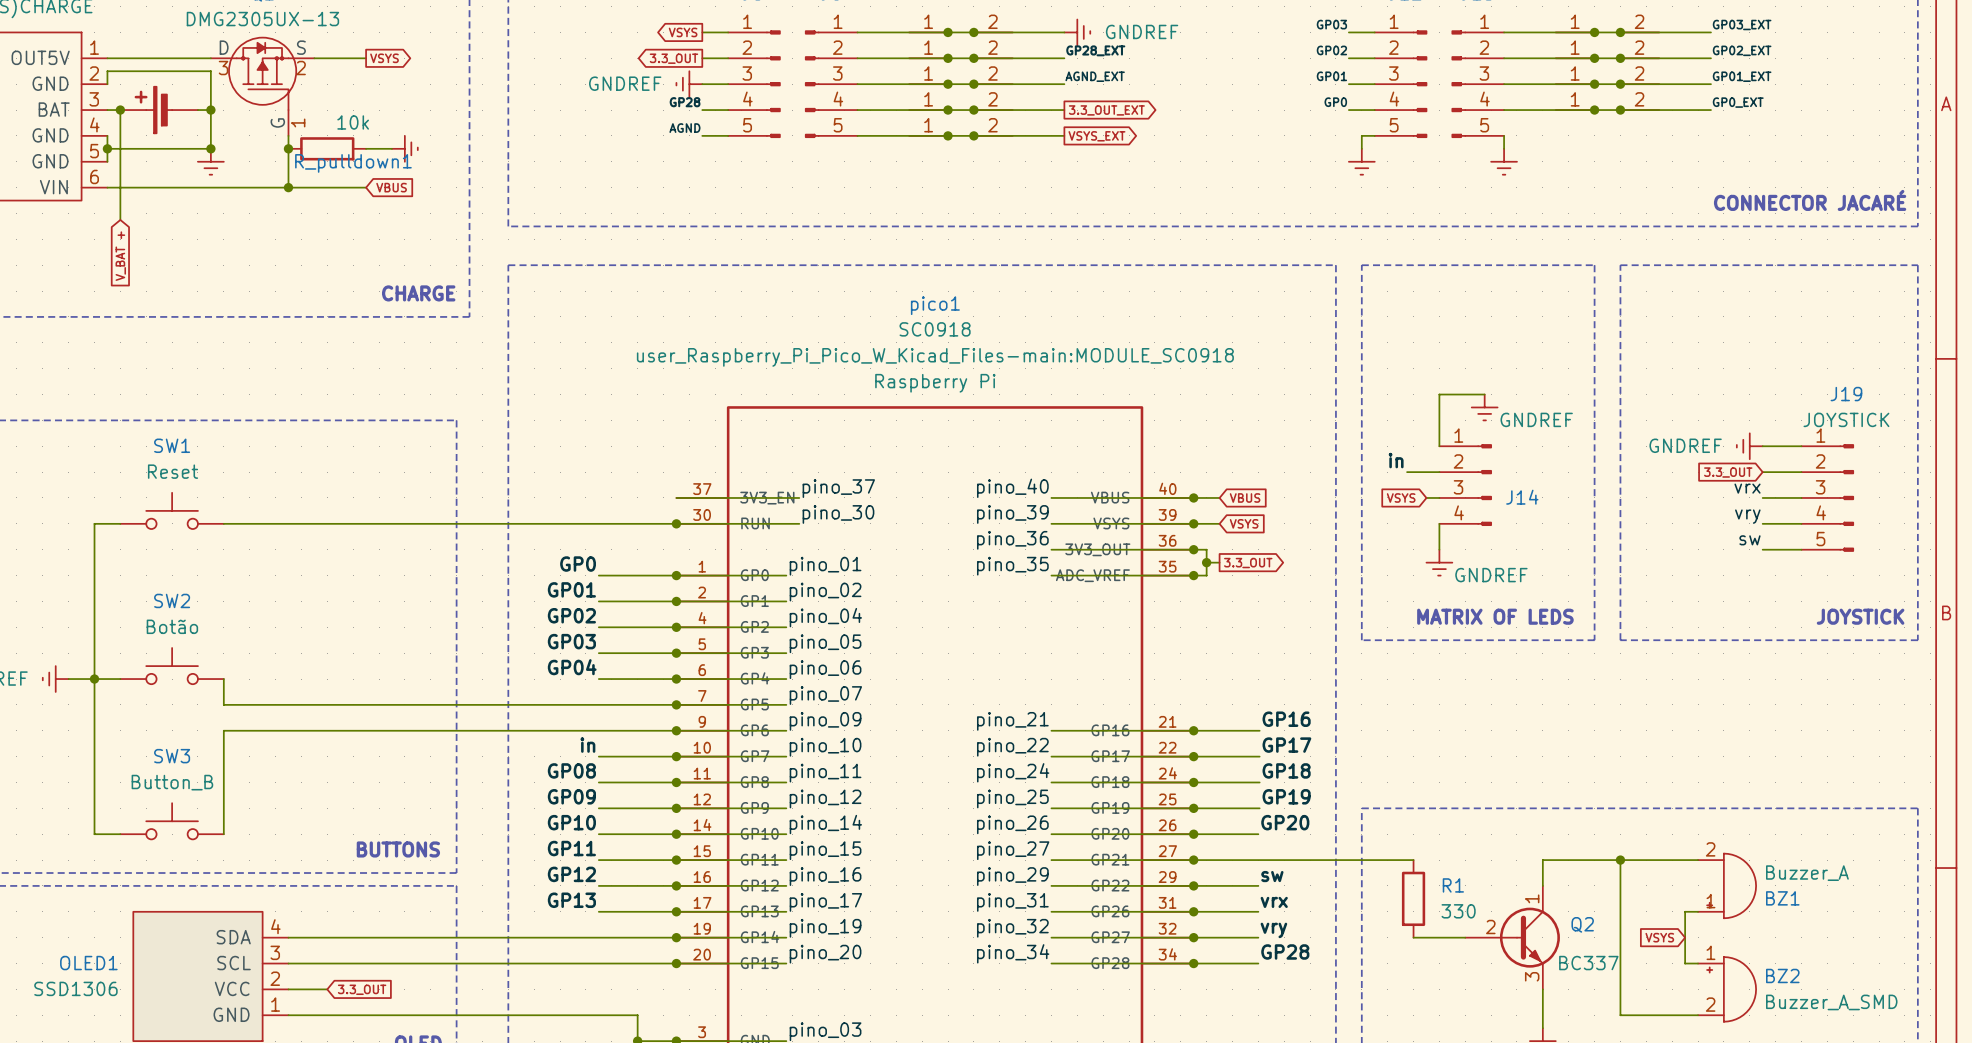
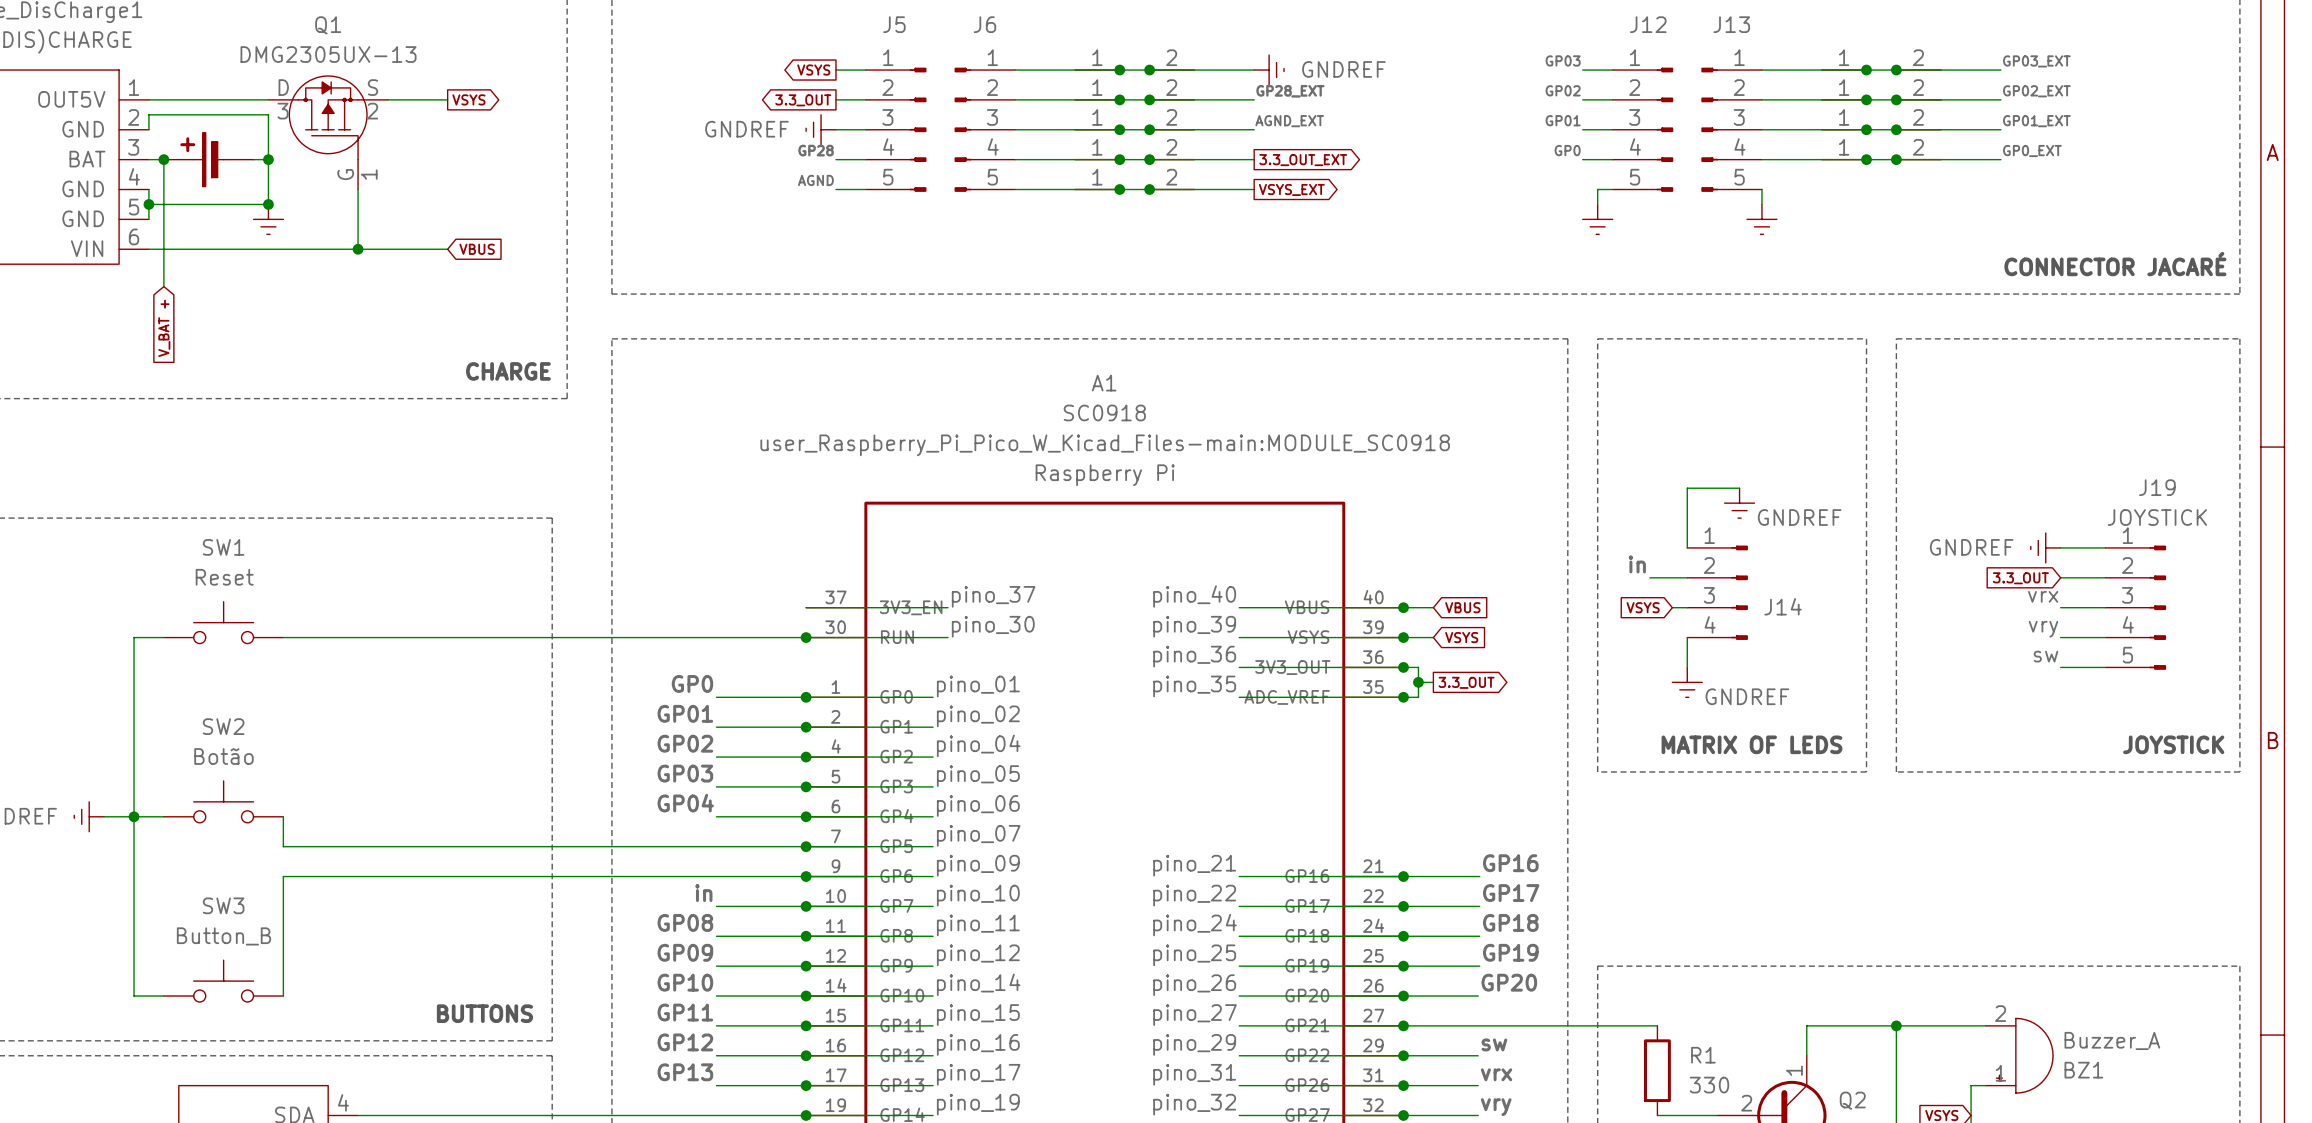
junction: (288, 148) -> none
R_pulldown1: 10k (327, 148) -> none
wire: (366, 148) (391, 148) -> none
power symbol: (404, 148) -> none
pico1 name: pico1 (935, 305) -> A1 (1104, 383)

